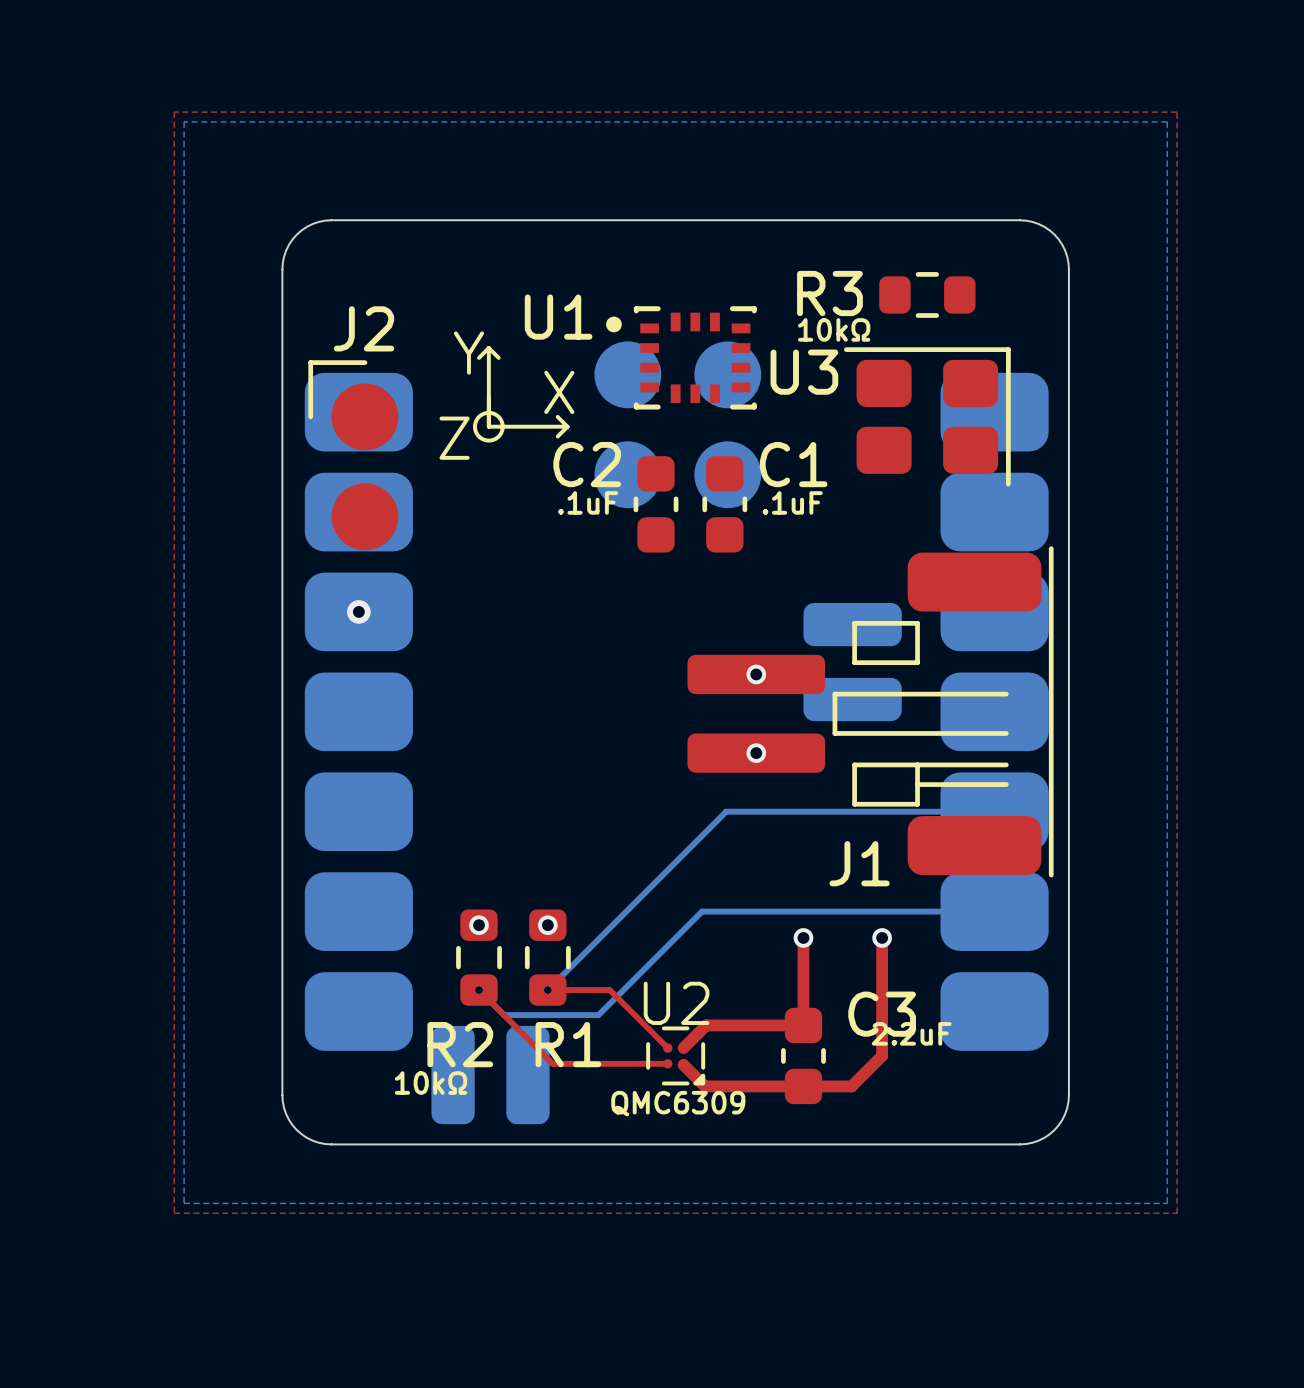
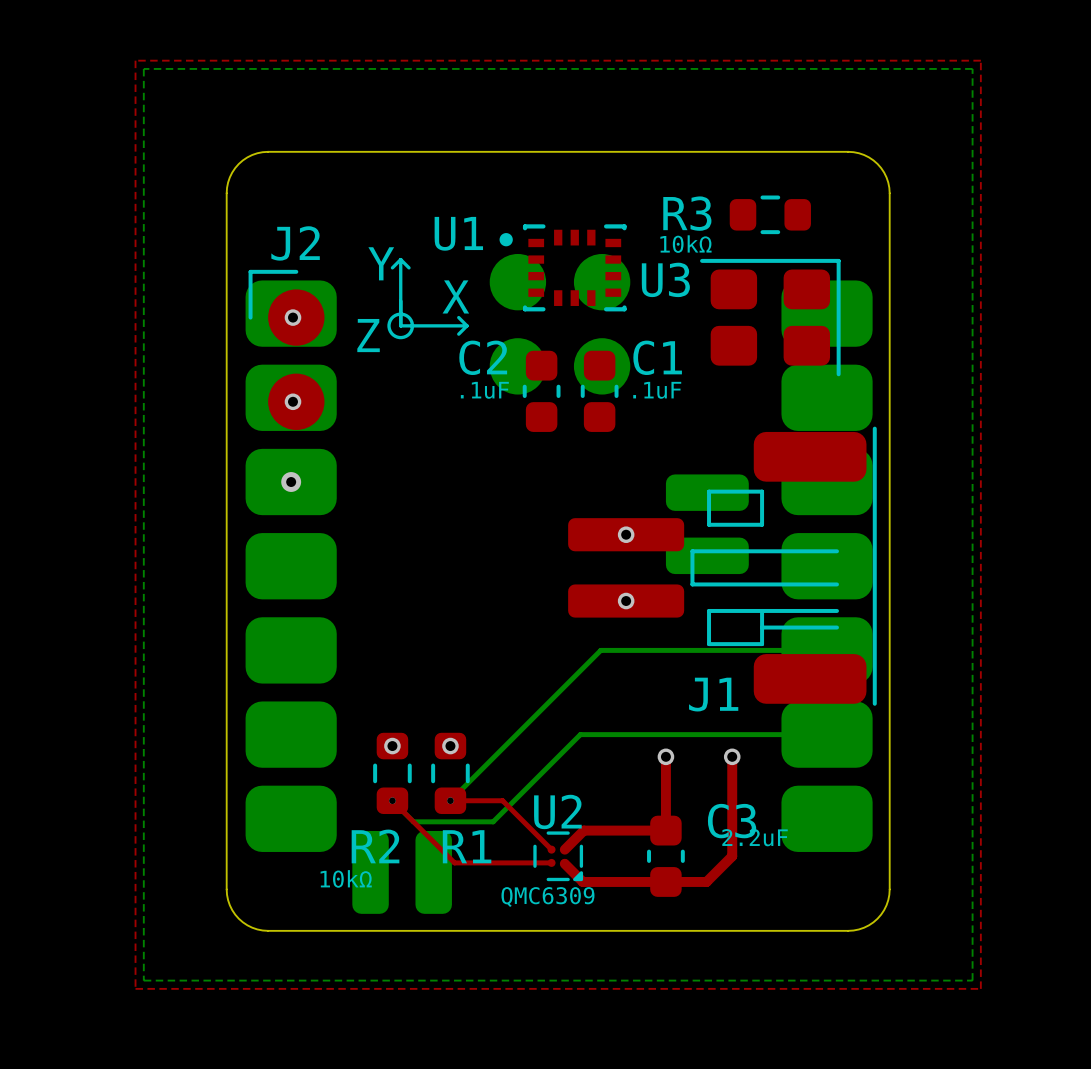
via: none -> (292, 317)
via: none -> (292, 401)

